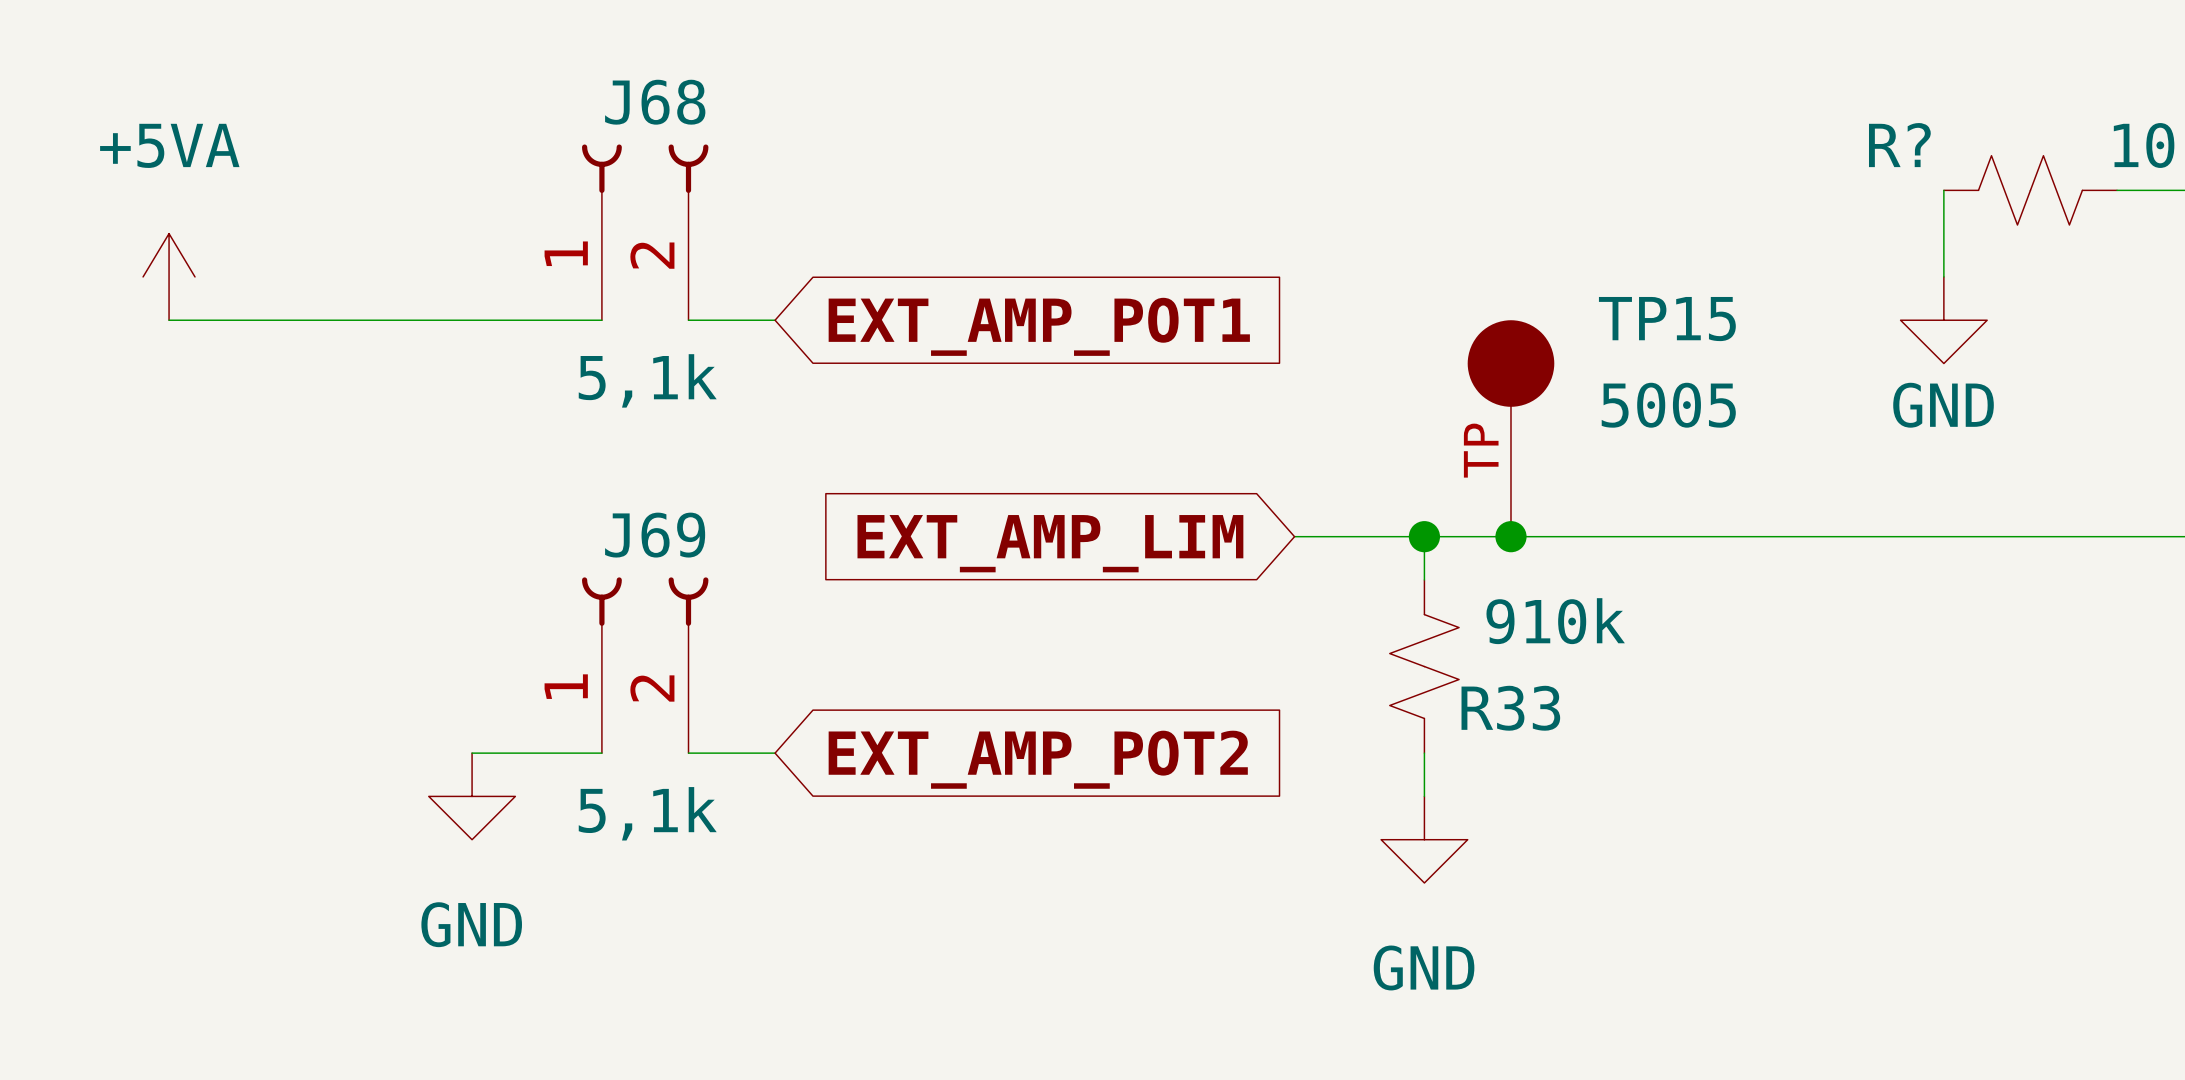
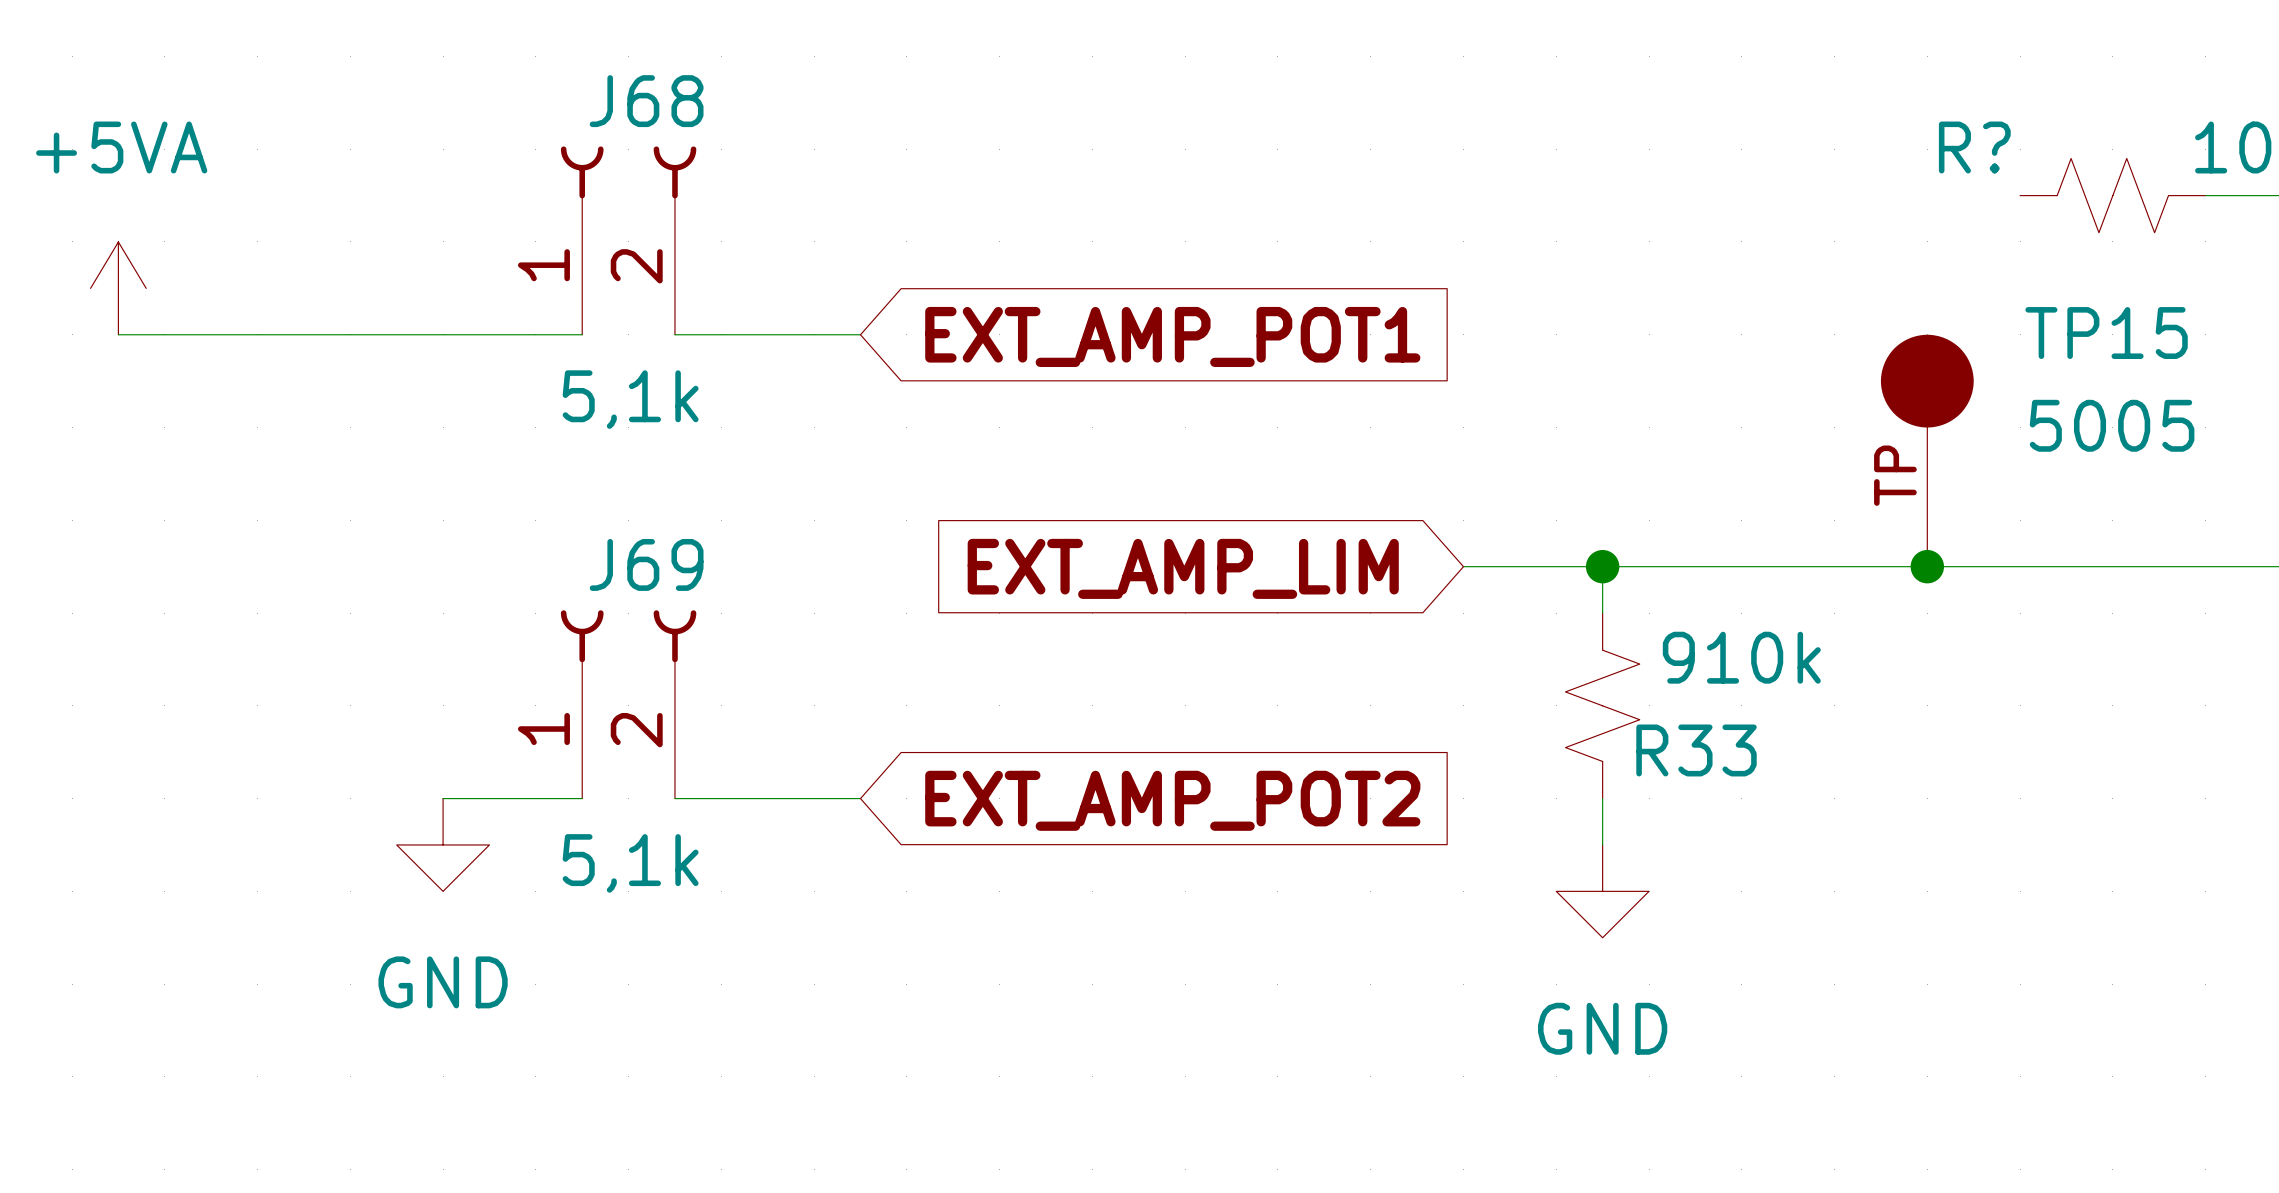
wire: (1943, 190) (1943, 276) -> none
wire: none -> (767, 334) (860, 334)
power symbol: GND (1943, 320) -> none
global label position: EXT_AMP_POT1 (1039, 326) -> EXT_AMP_POT1 (1172, 336)
TP15 position: (1510, 428) -> (1927, 450)
wire: (1294, 536) (1424, 536) (1424, 579) -> none
junction: (1424, 536) -> none
junction position: (1510, 536) -> (1602, 566)
wire: none -> (1602, 566) (1602, 613)
junction: none -> (1927, 566)
global label position: EXT_AMP_LIM (1050, 543) -> EXT_AMP_LIM (1183, 568)
R33 position: (1424, 666) -> (1602, 705)
wire: none -> (767, 798) (860, 798)
wire: (1424, 753) (1424, 796) -> (1602, 798) (1602, 844)
global label position: EXT_AMP_POT2 (1038, 759) -> EXT_AMP_POT2 (1172, 800)
power symbol position: GND (1424, 839) -> GND (1602, 891)

